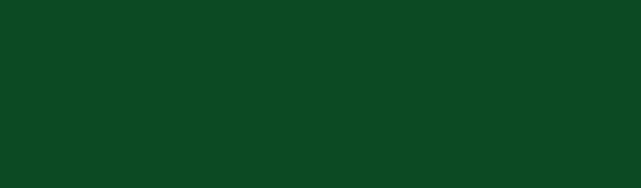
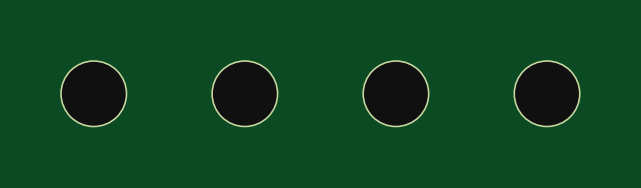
part: none -> (93, 93)
part: none -> (244, 93)
part: none -> (395, 93)
part: none -> (547, 93)

